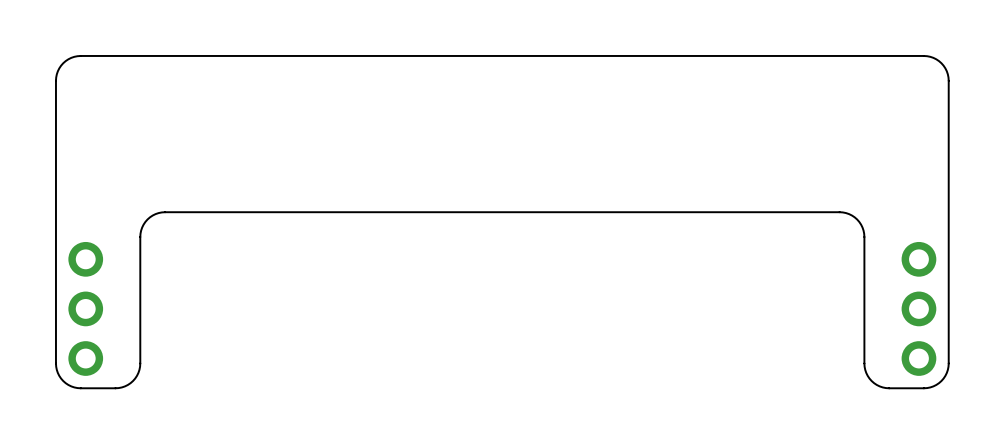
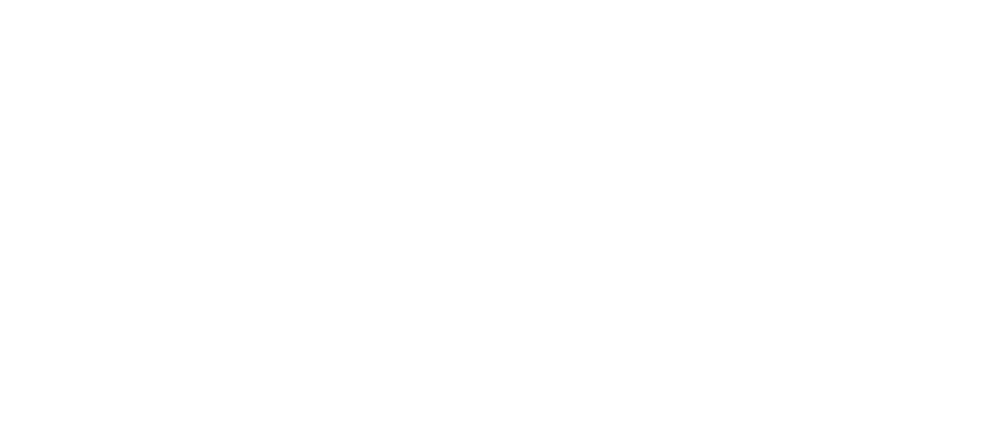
board edge: (923, 55) (80, 55) (71, 57) (61, 65) (55, 80) (55, 363) (57, 372) (65, 383) (80, 388) (121, 387) (130, 383) (136, 375) (140, 363) (140, 233) (145, 221) (158, 213) (839, 212) (854, 217) (861, 224) (864, 233) (864, 363) (867, 375) (874, 383) (885, 388) (923, 388) (933, 386) (943, 378) (948, 363) (948, 80) (946, 71) (941, 63) (933, 57) (923, 55) -> none
part: (85, 308) -> none
part: (918, 308) -> none

